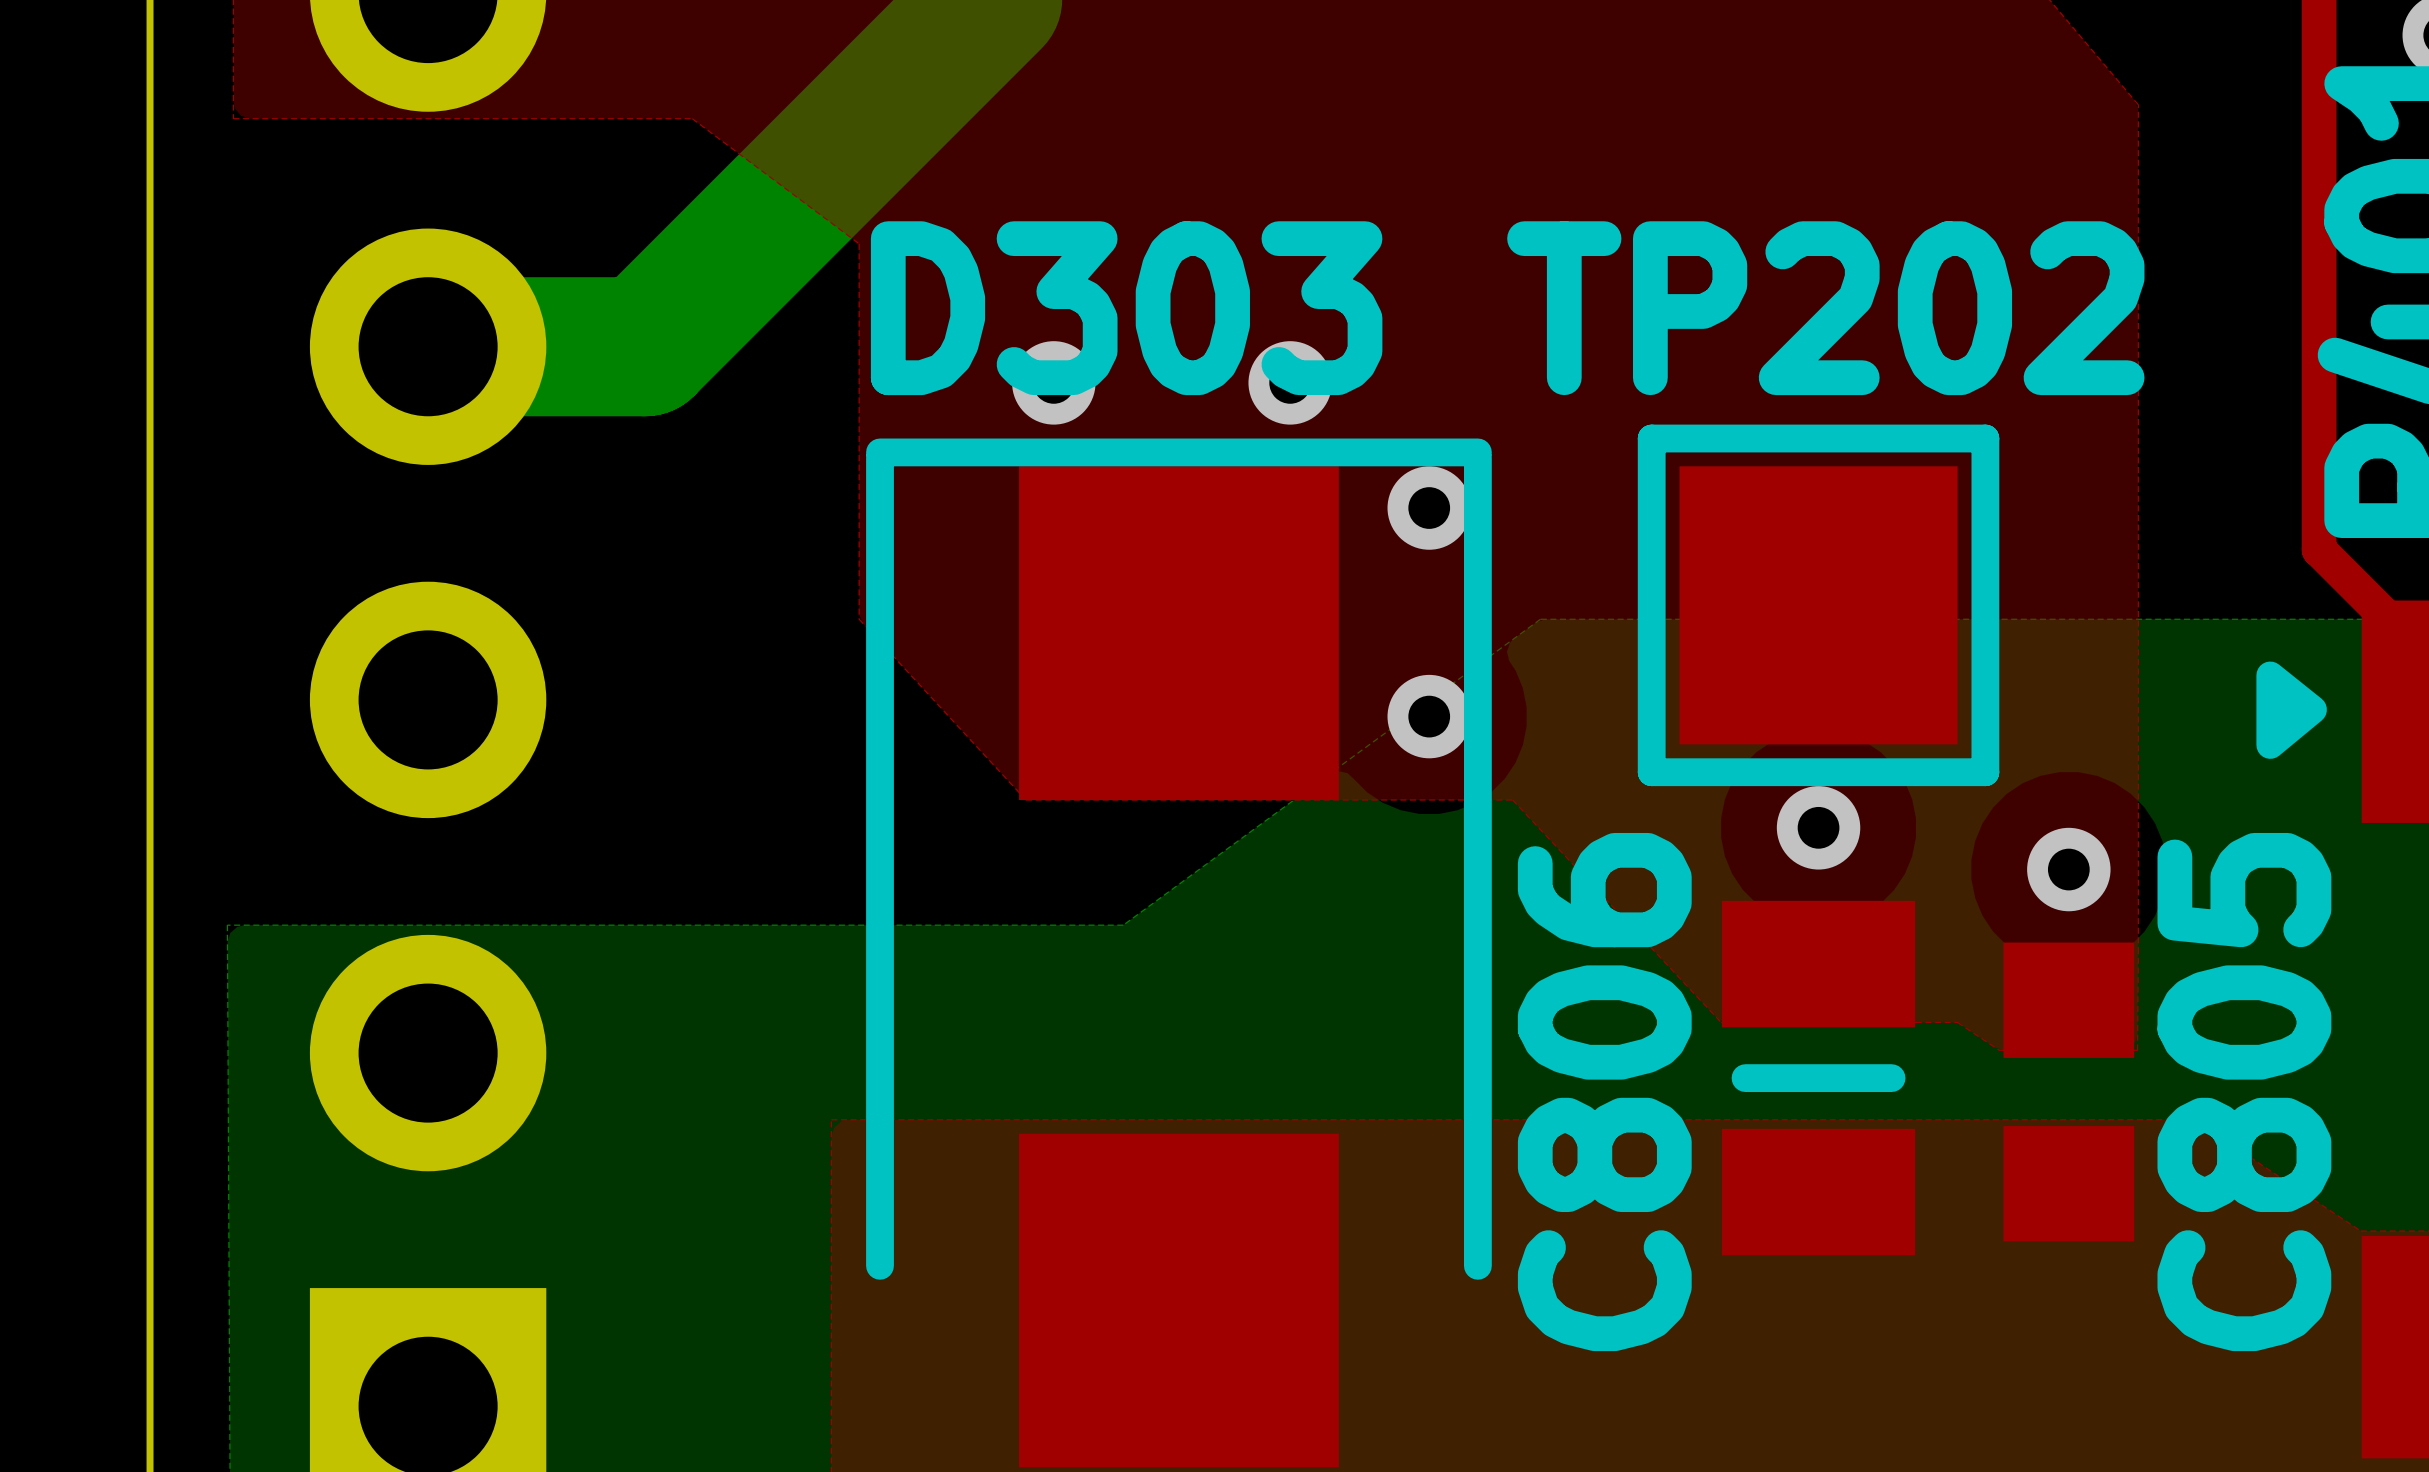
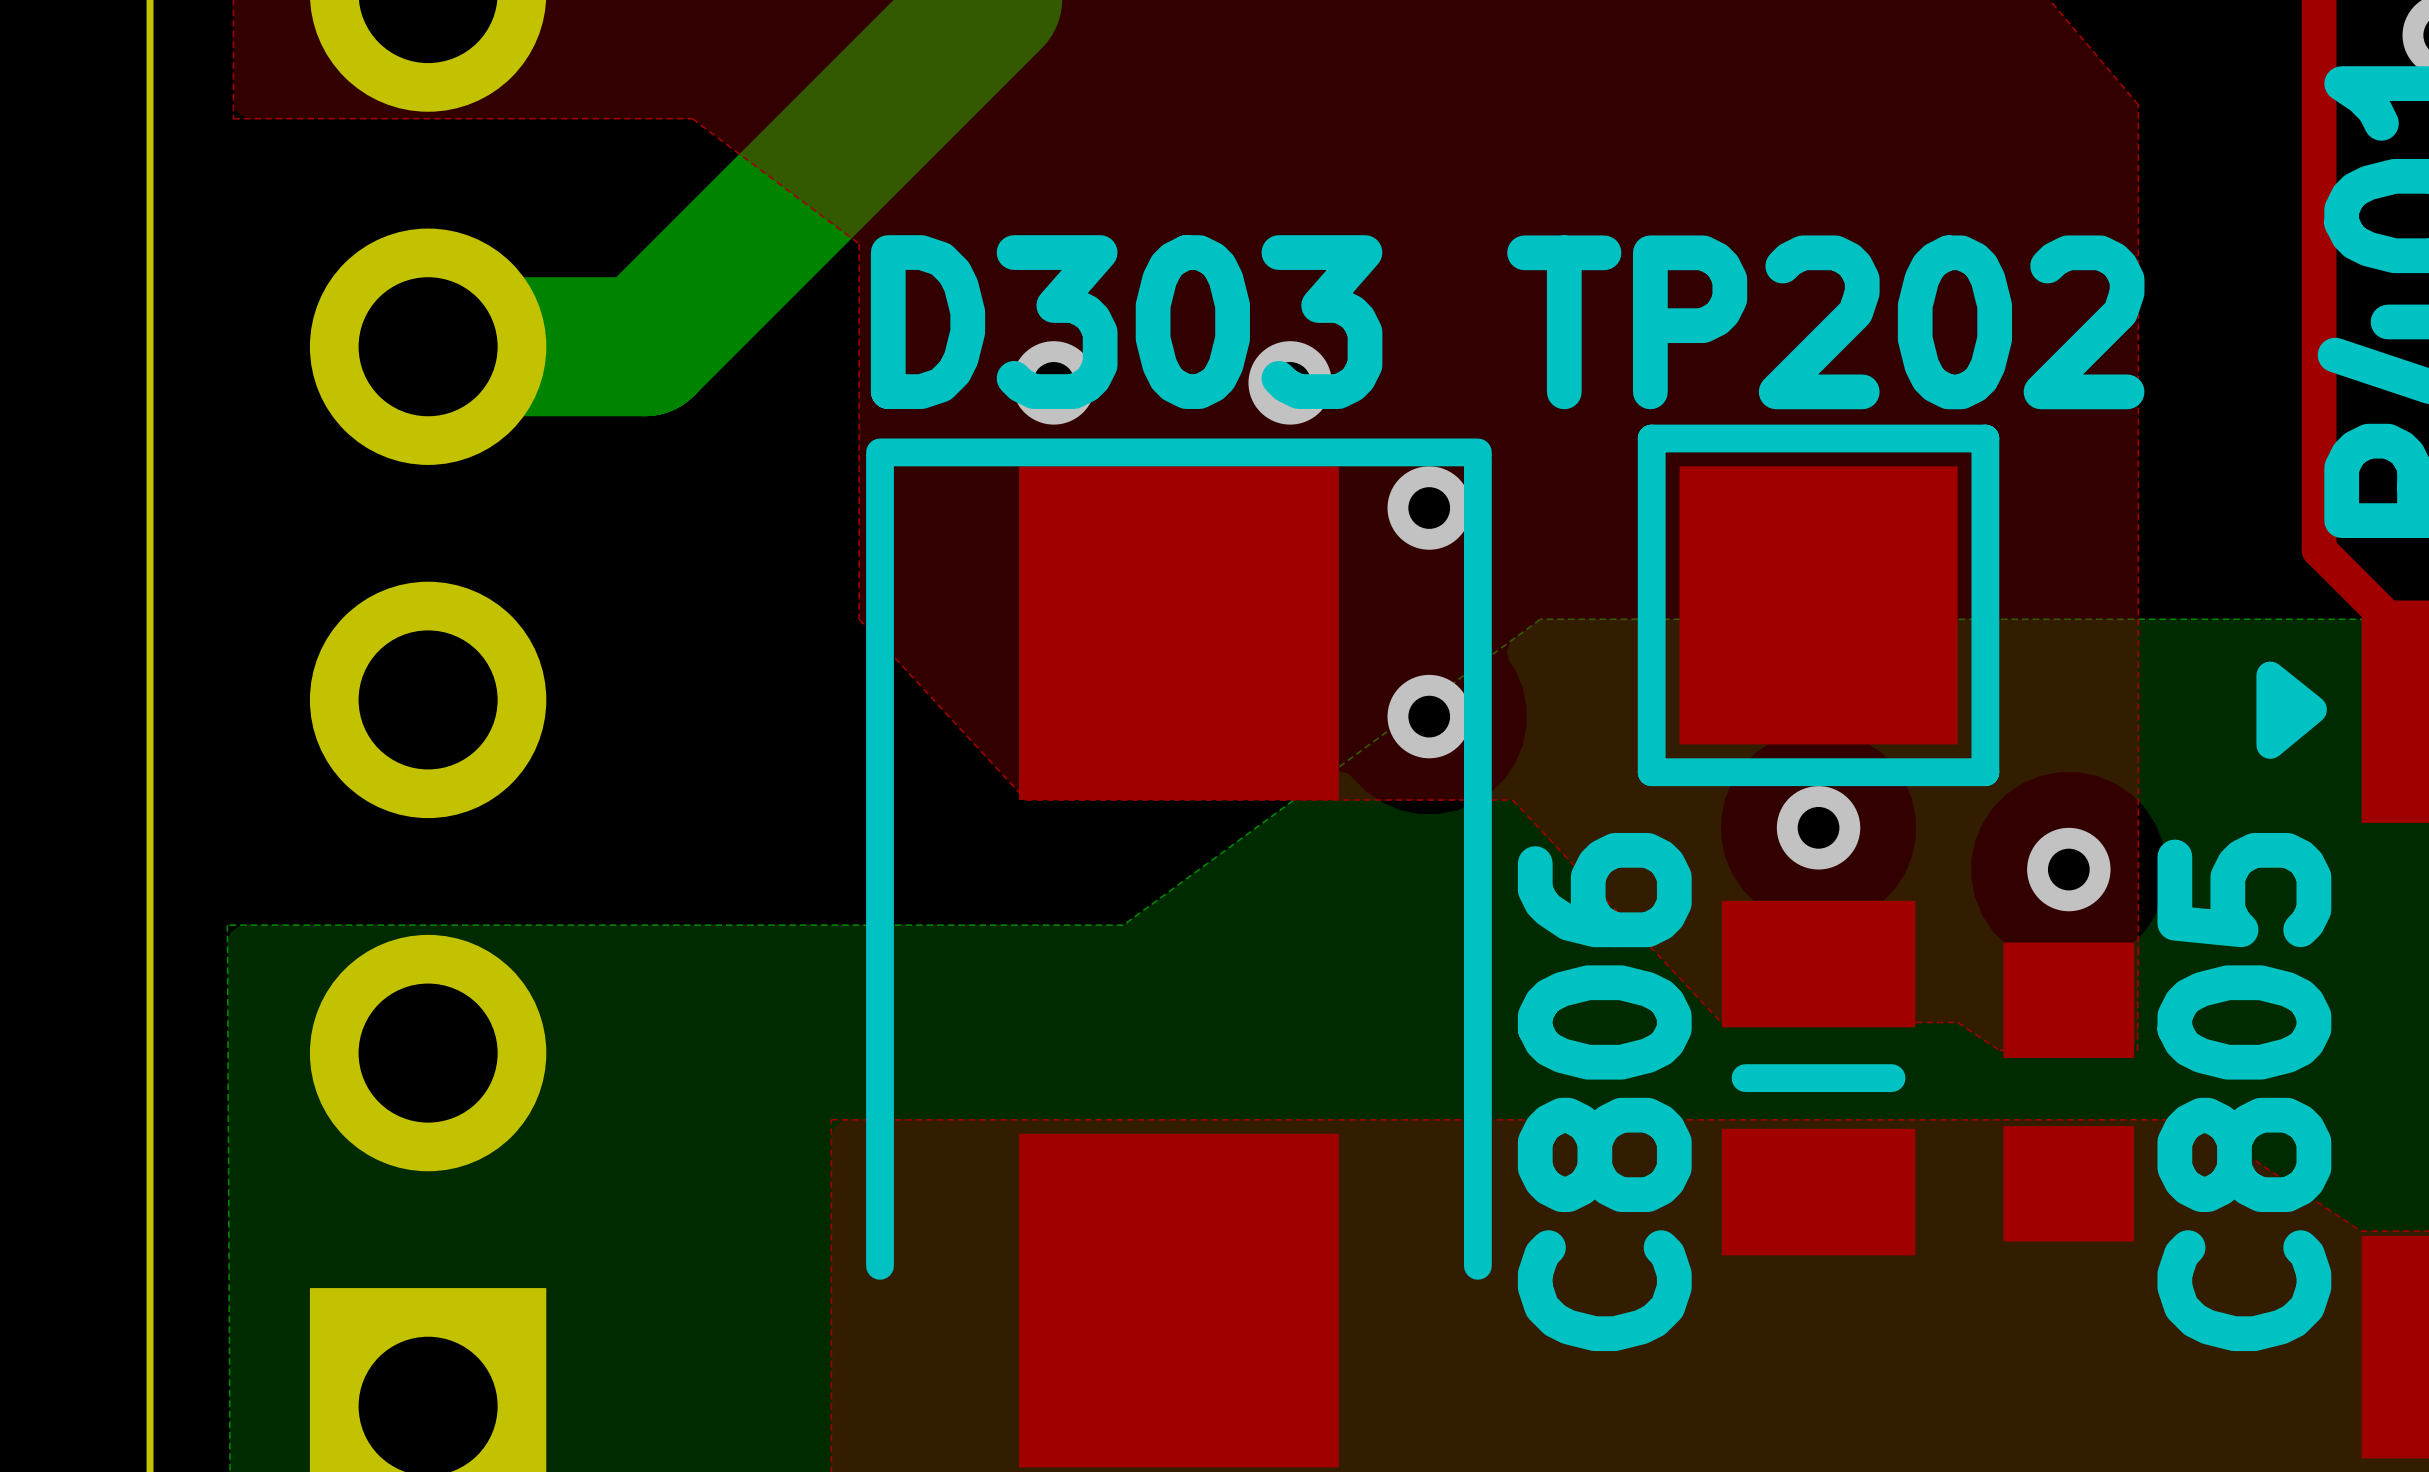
D303 name position: D303 (1126, 308) -> D303 (1126, 322)
TP202 name position: TP202 (1825, 308) -> TP202 (1825, 322)

